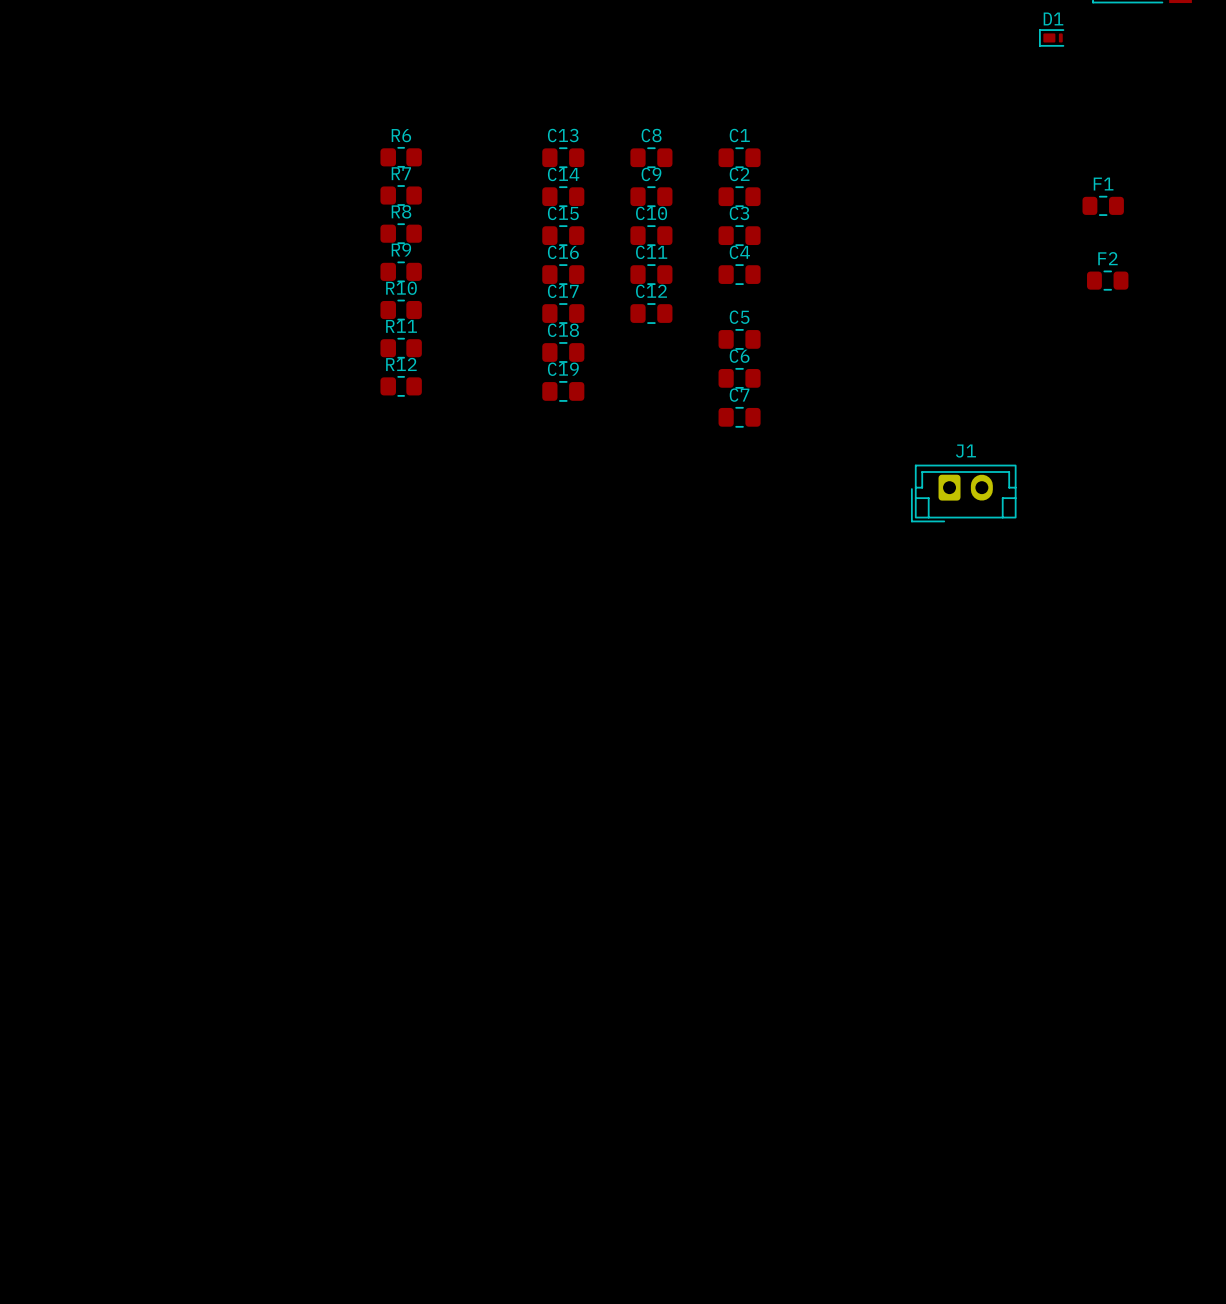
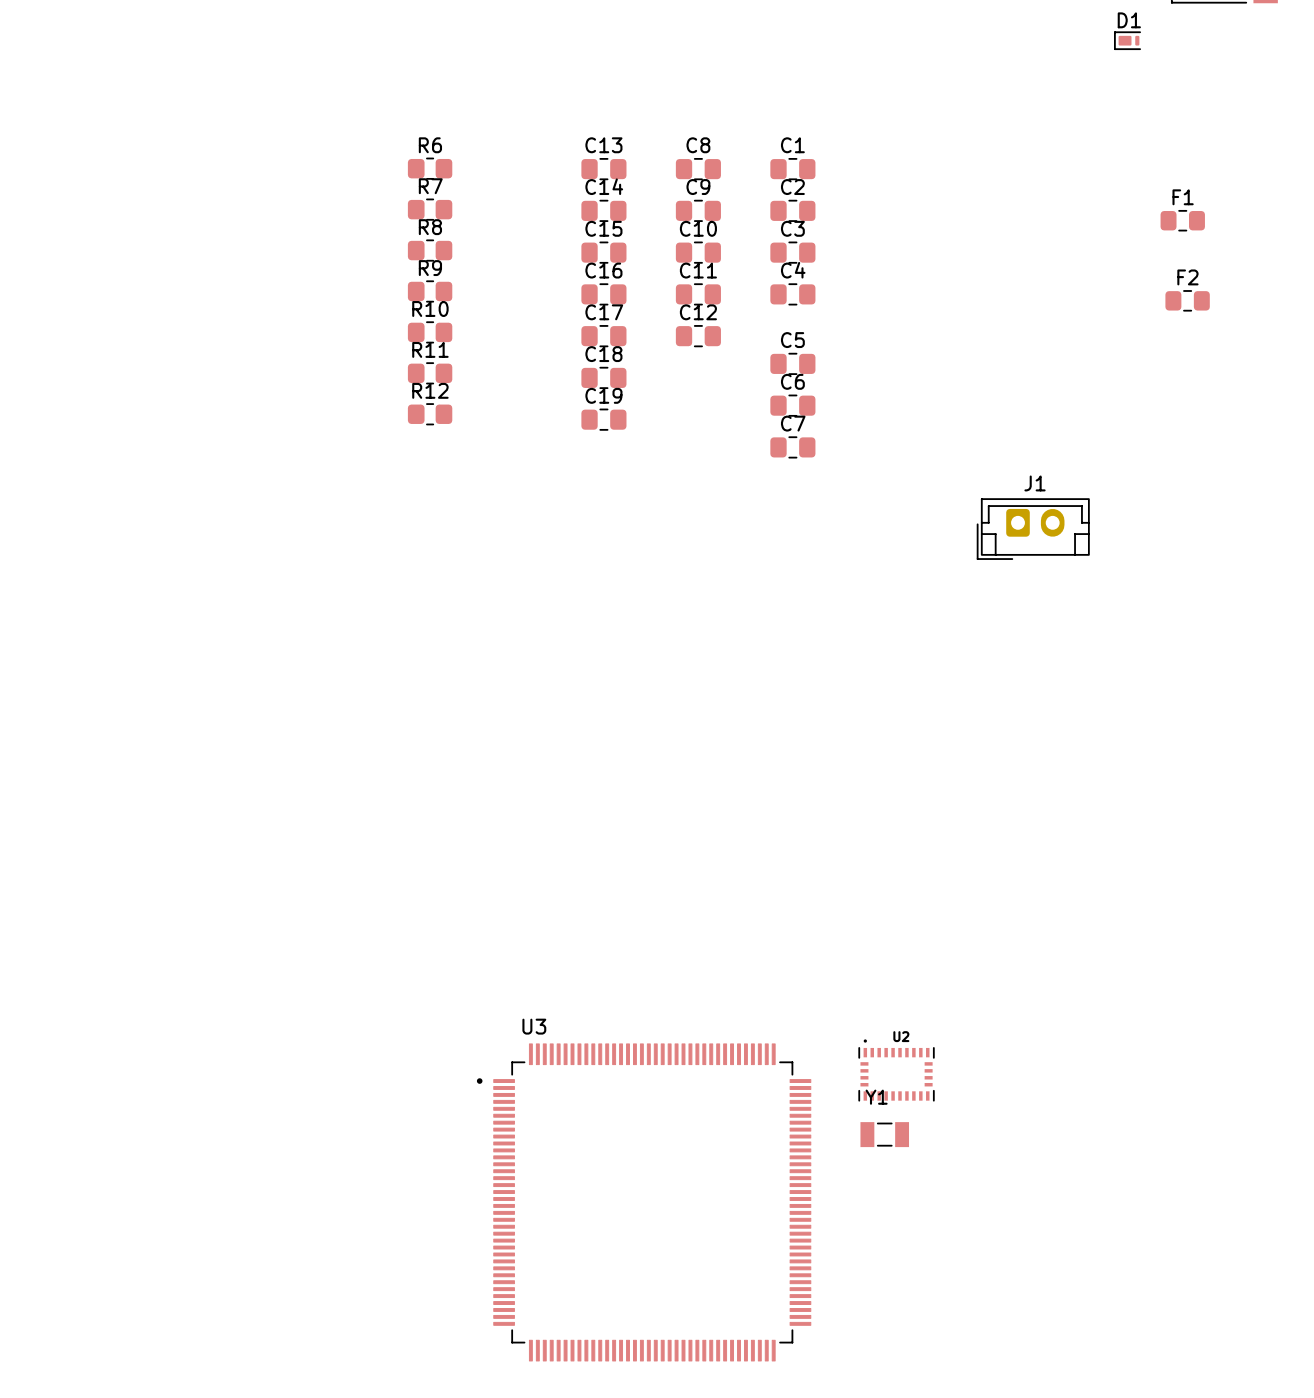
U2: none -> (896, 1070)
Y1: none -> (884, 1134)
U3: none -> (644, 1202)

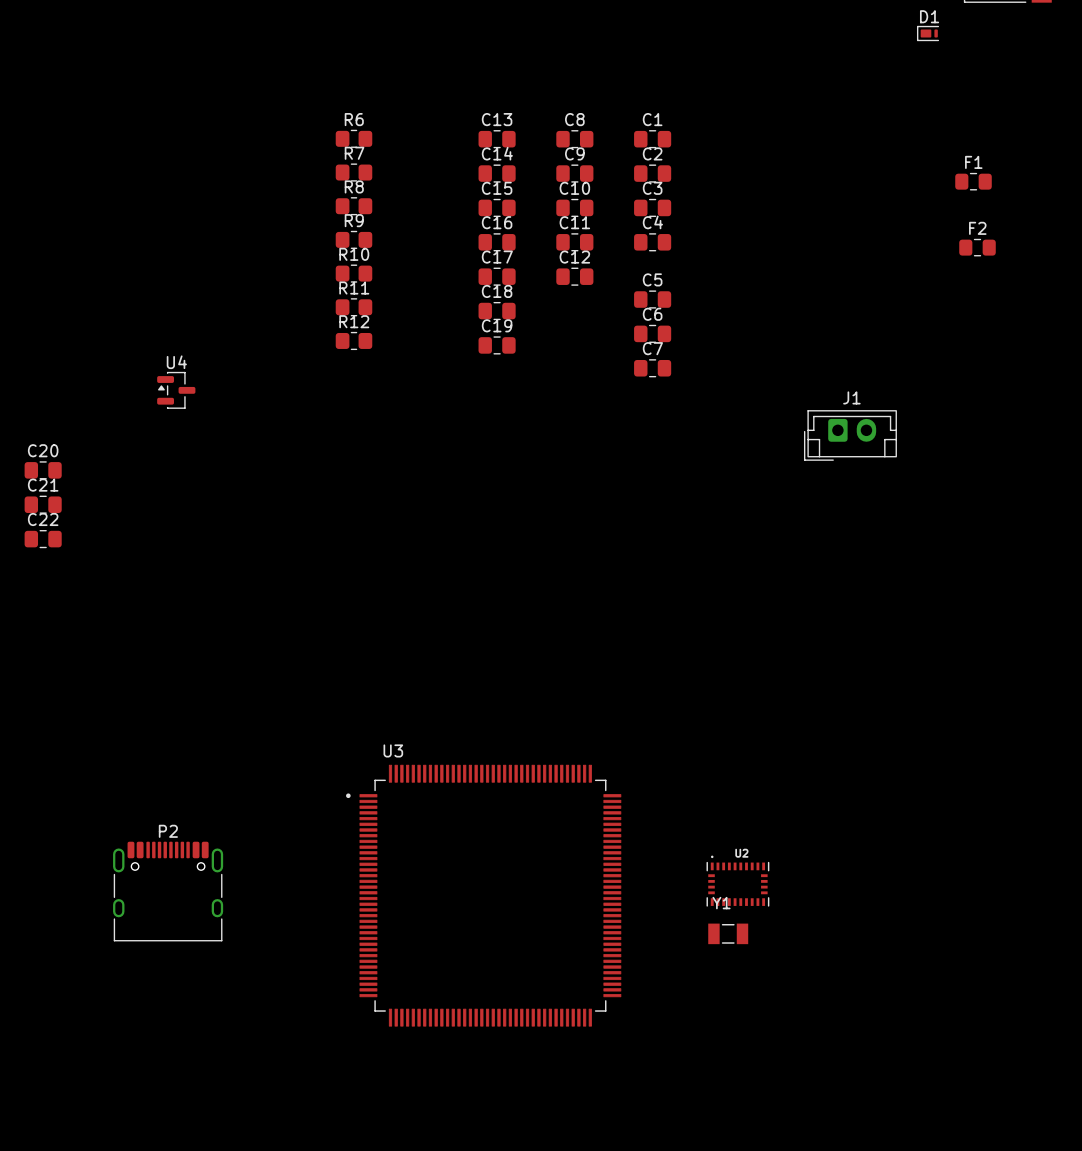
U4: none -> (176, 390)
C20: none -> (43, 470)
C21: none -> (43, 504)
C22: none -> (43, 539)
P2: none -> (168, 891)
U3 position: (644, 1202) -> (483, 895)

